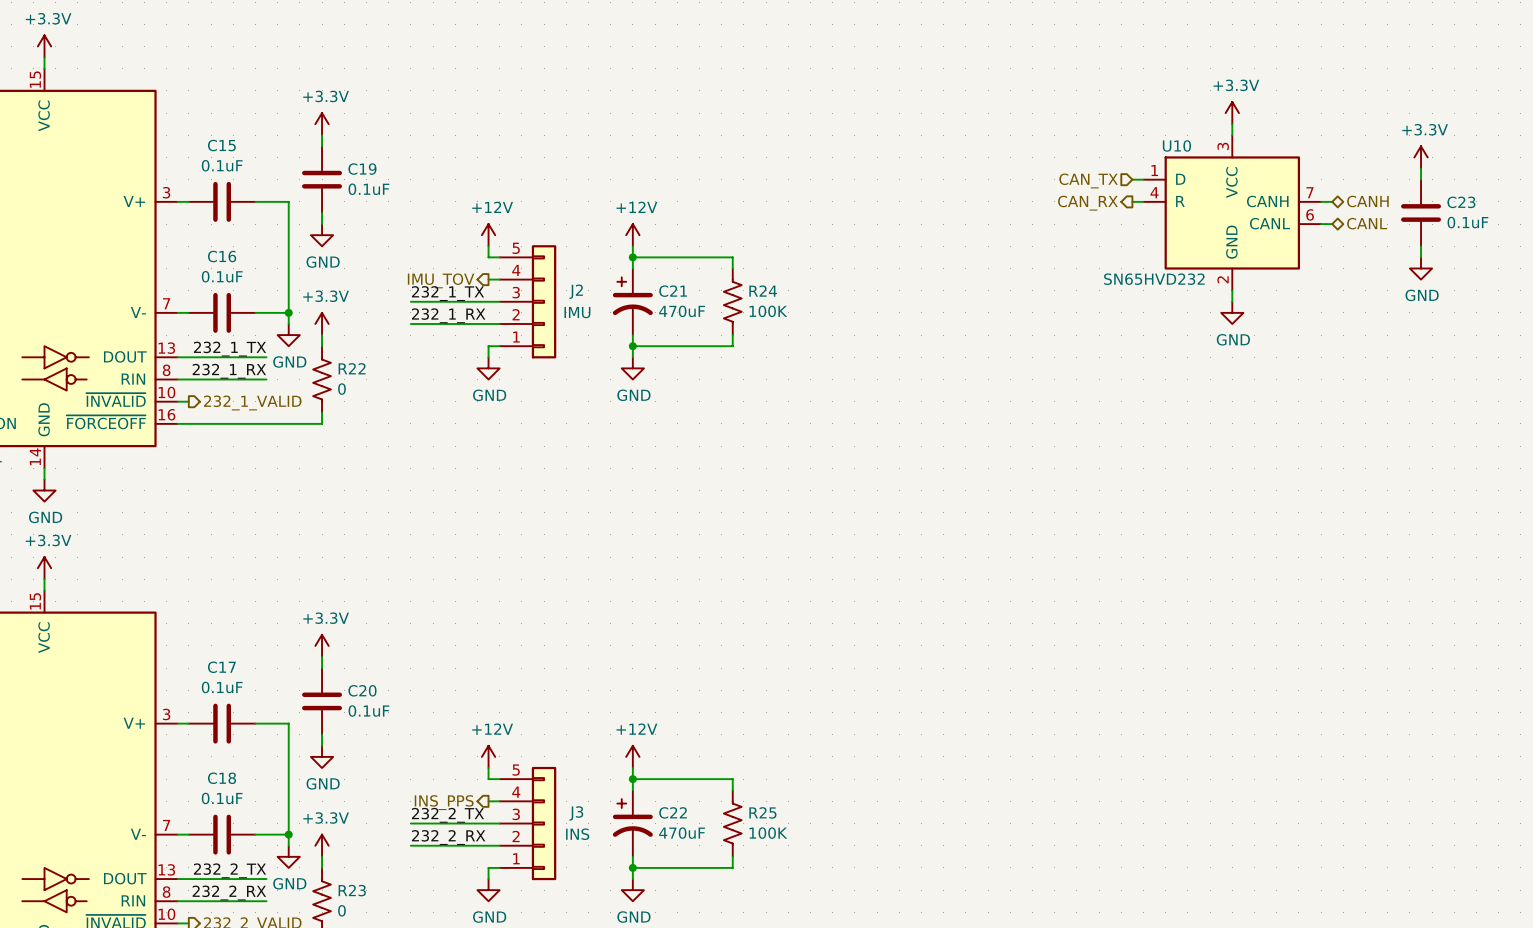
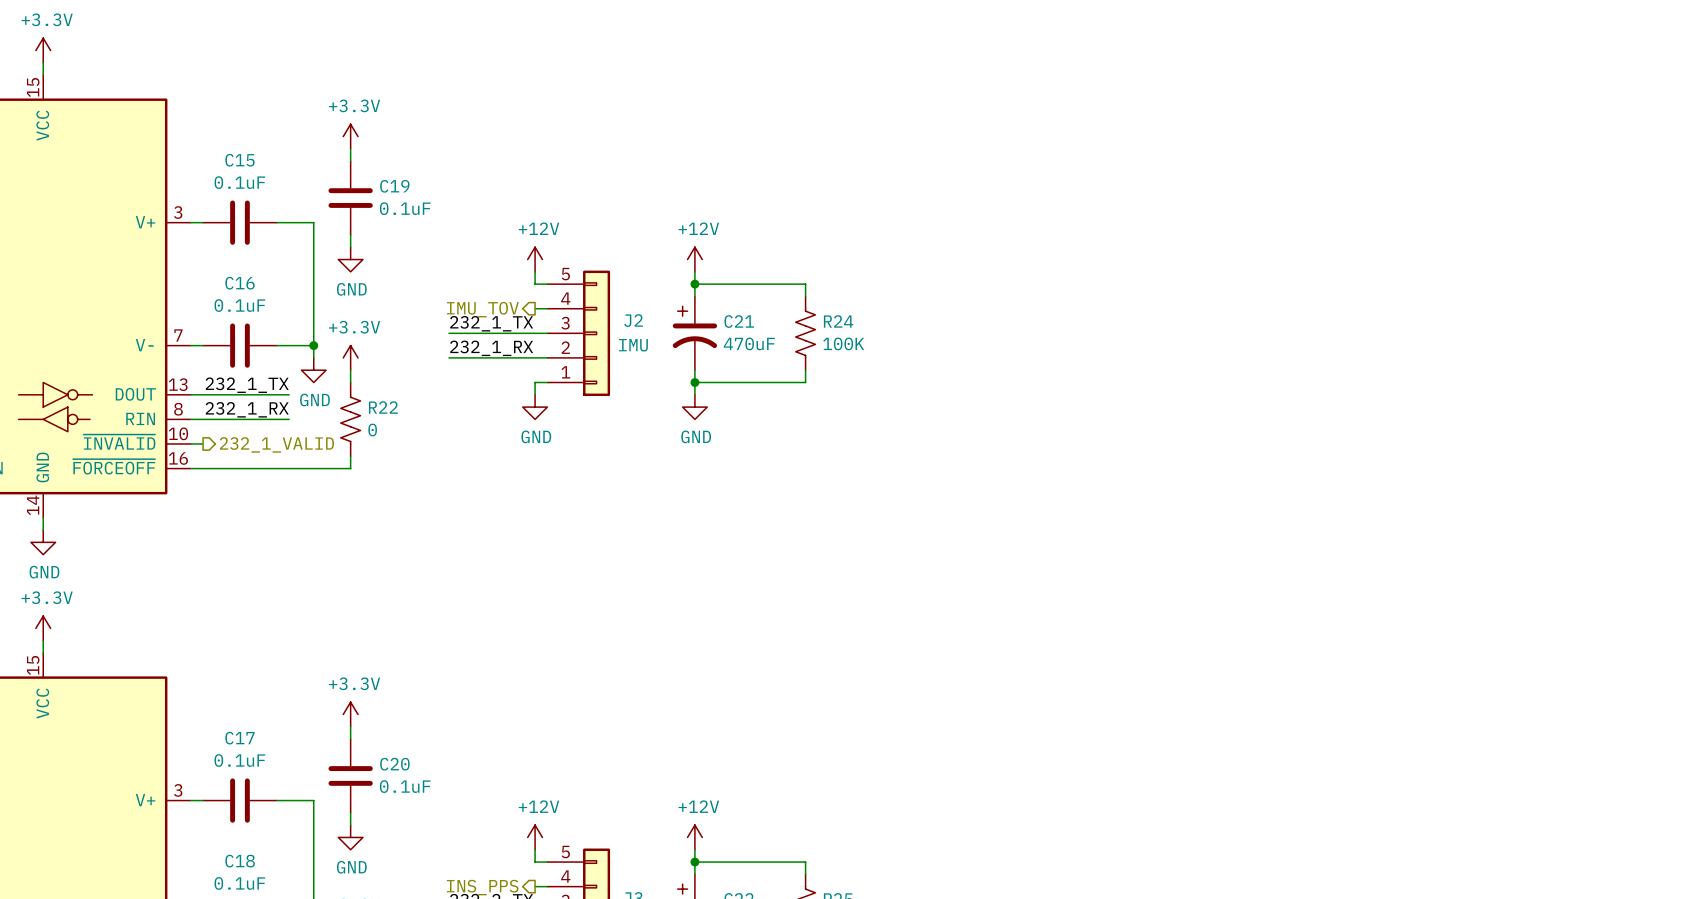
power symbol: +3.3V (1232, 113) -> none
wire: (1232, 124) (1232, 135) -> none
power symbol: +3.3V (1421, 157) -> none
wire: (1421, 168) (1421, 179) -> none
wire: (1132, 179) (1143, 179) -> none
hierarchical label: CAN_TX (1088, 180) -> none
wire: (1132, 201) (1143, 201) -> none
wire: (1321, 201) (1332, 201) -> none
hierarchical label: CANH (1367, 201) -> none
hierarchical label: CAN_RX (1087, 203) -> none
U10: SN65HVD232 (1232, 212) -> none
C23: 0.1uF (1421, 212) -> none
hierarchical label: CANL (1367, 223) -> none
wire: (1321, 224) (1332, 224) -> none
wire: (1421, 246) (1421, 257) -> none
power symbol: GND (1421, 268) -> none
wire: (1232, 290) (1232, 301) -> none
power symbol: GND (1232, 312) -> none

